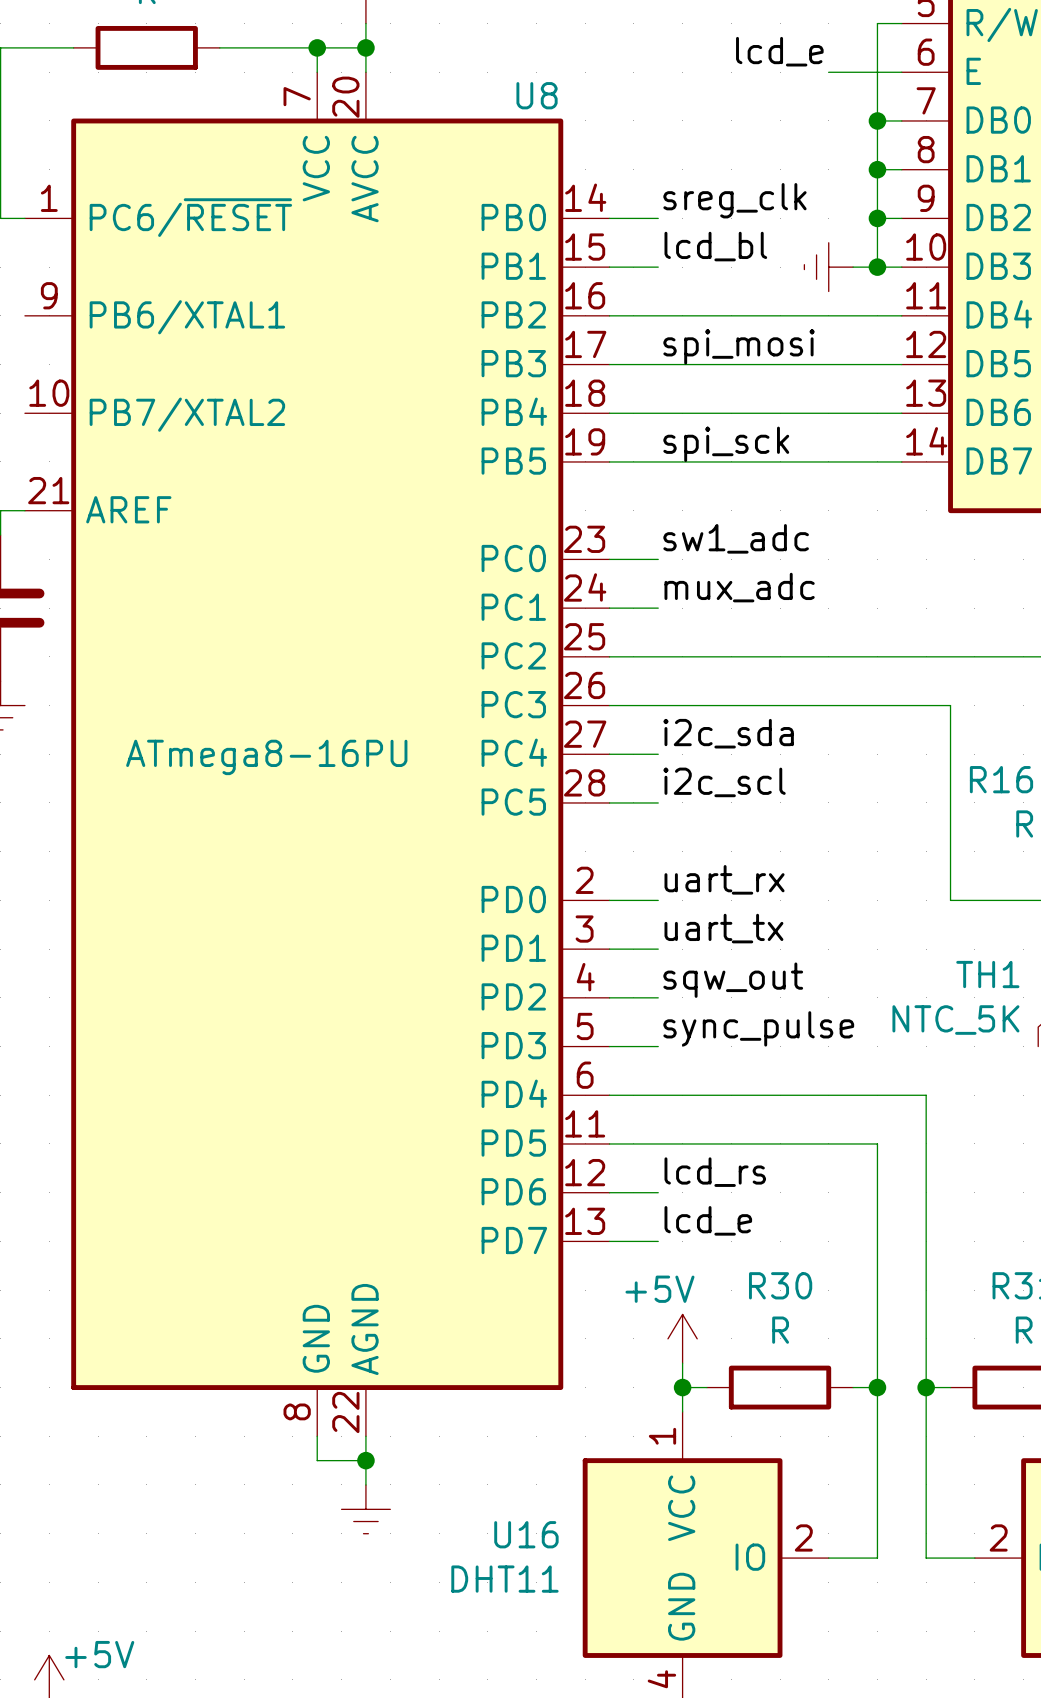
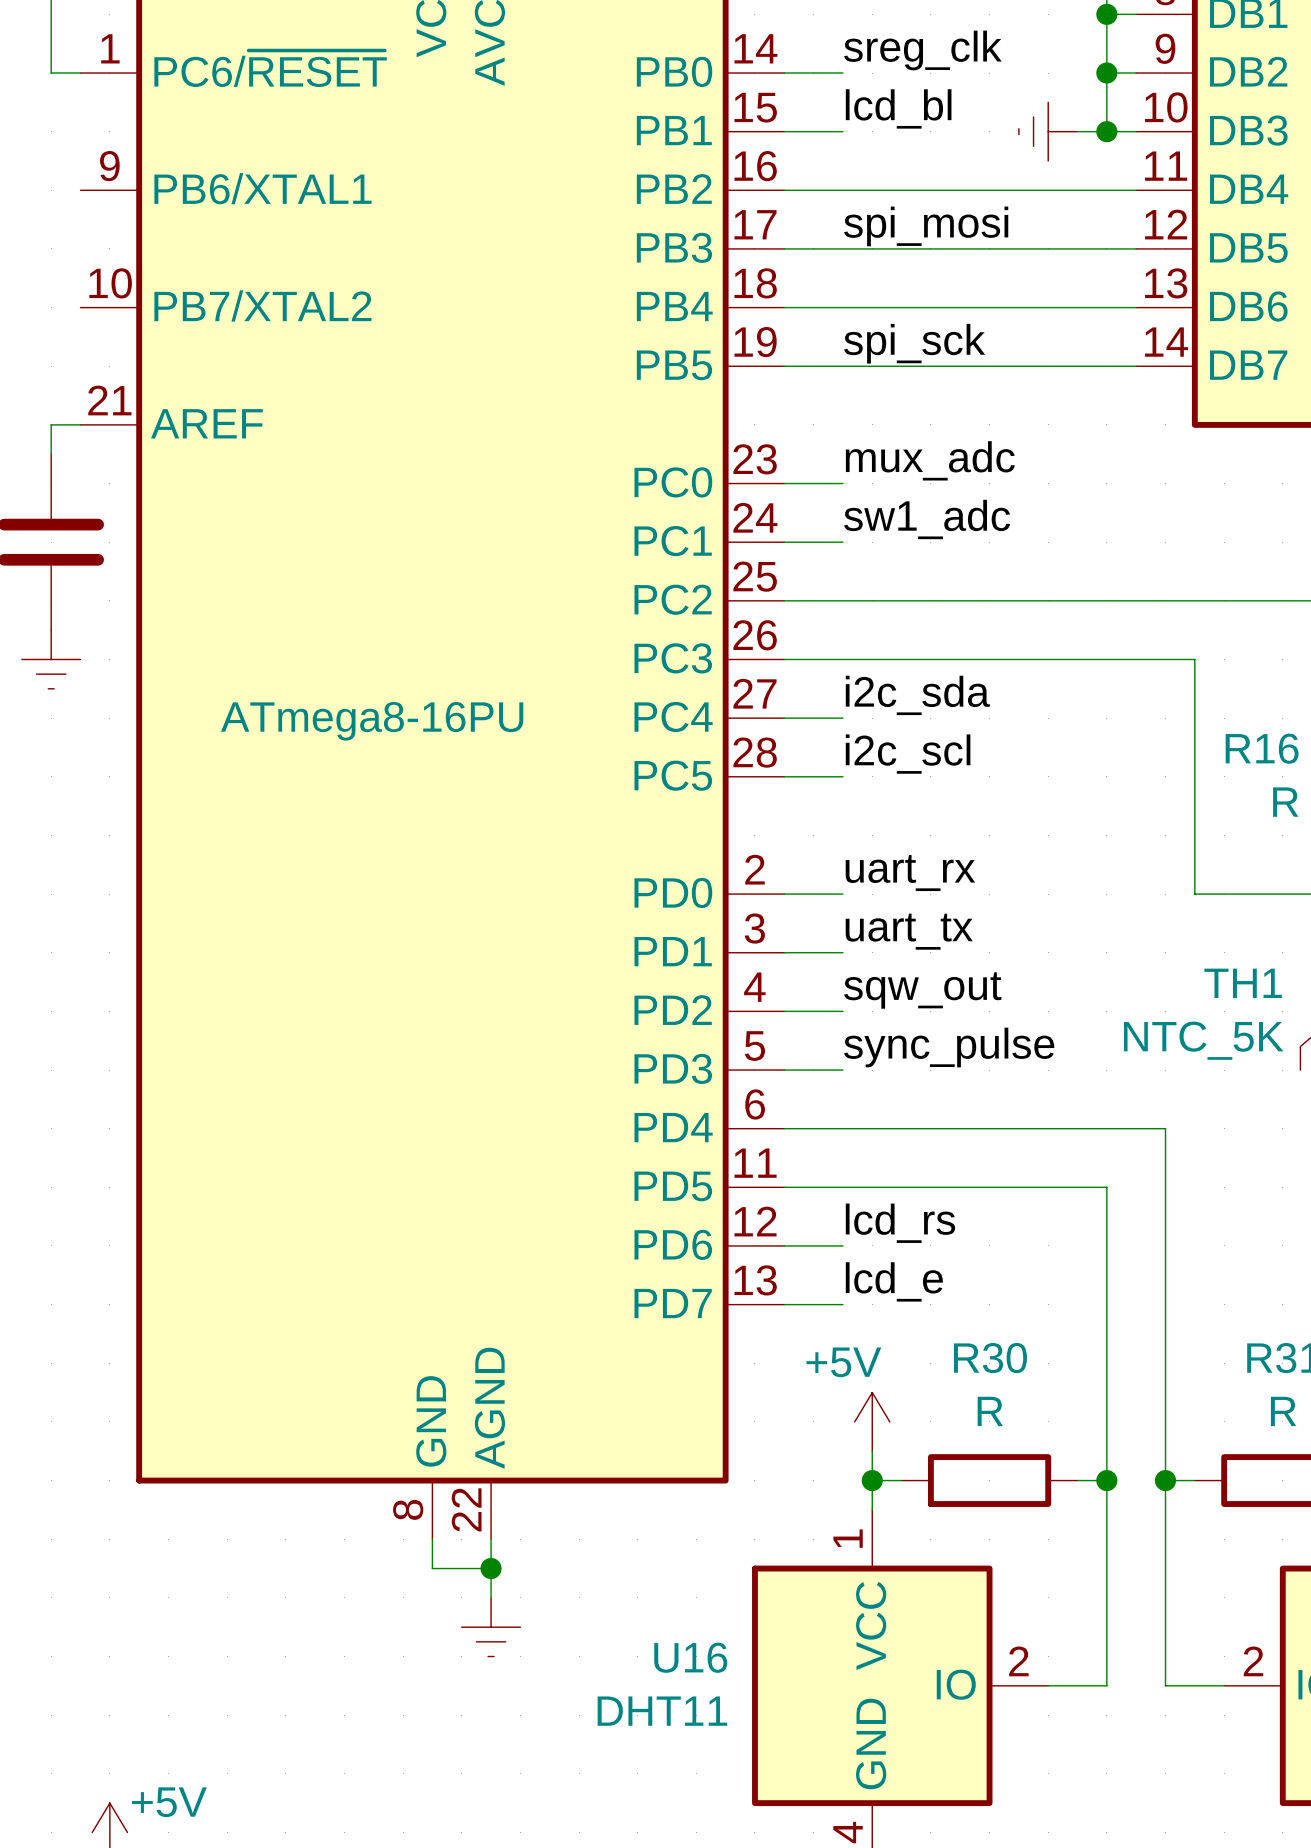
label: sw1_adc (736, 538) -> mux_adc (930, 460)
label: mux_adc (739, 587) -> sw1_adc (927, 519)

